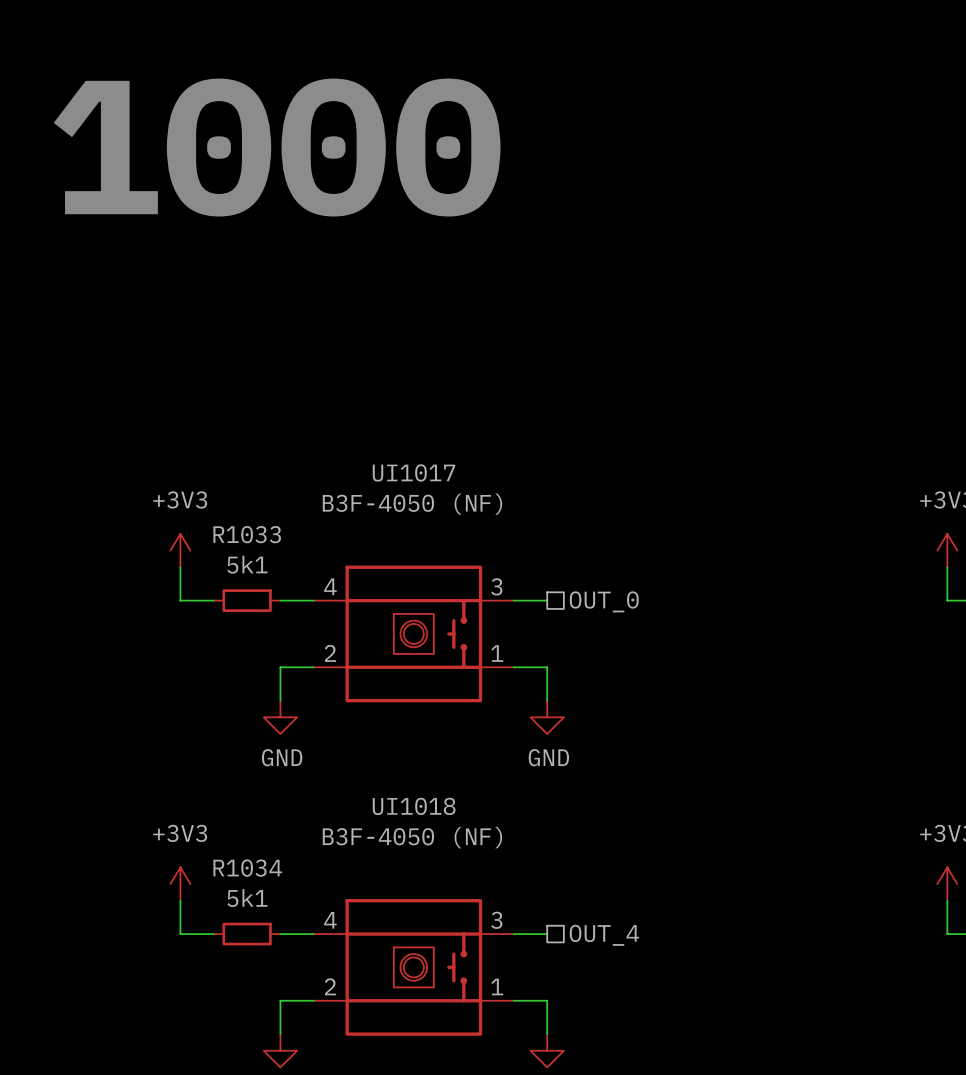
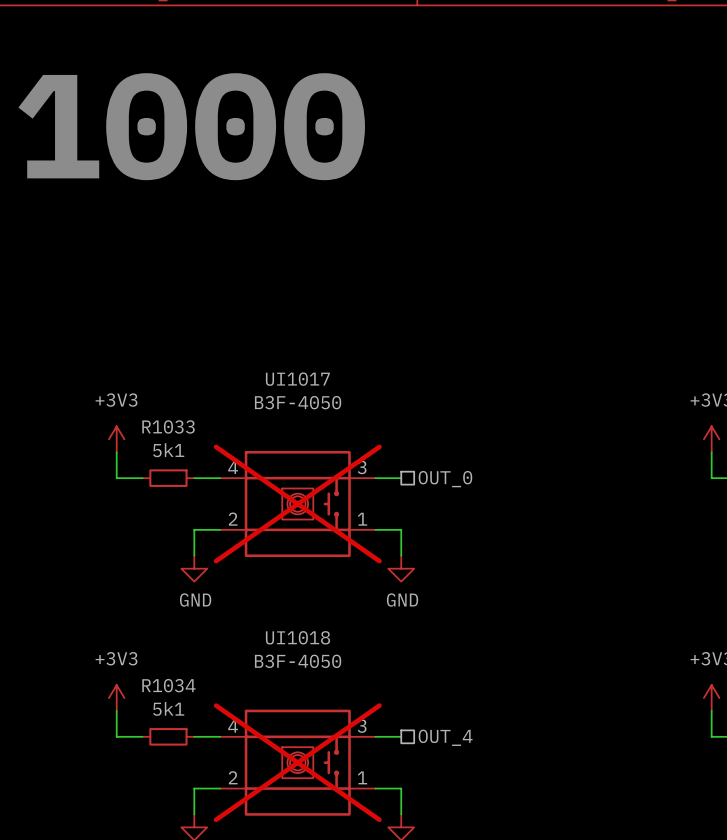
UI1017 value: B3F-4050 (NF) (412, 504) -> B3F-4050 (298, 402)
UI1017 do-not-place cross: none -> (297, 504)
UI1018 value: B3F-4050 (NF) (412, 837) -> B3F-4050 (298, 661)
UI1018 do-not-place cross: none -> (297, 762)

